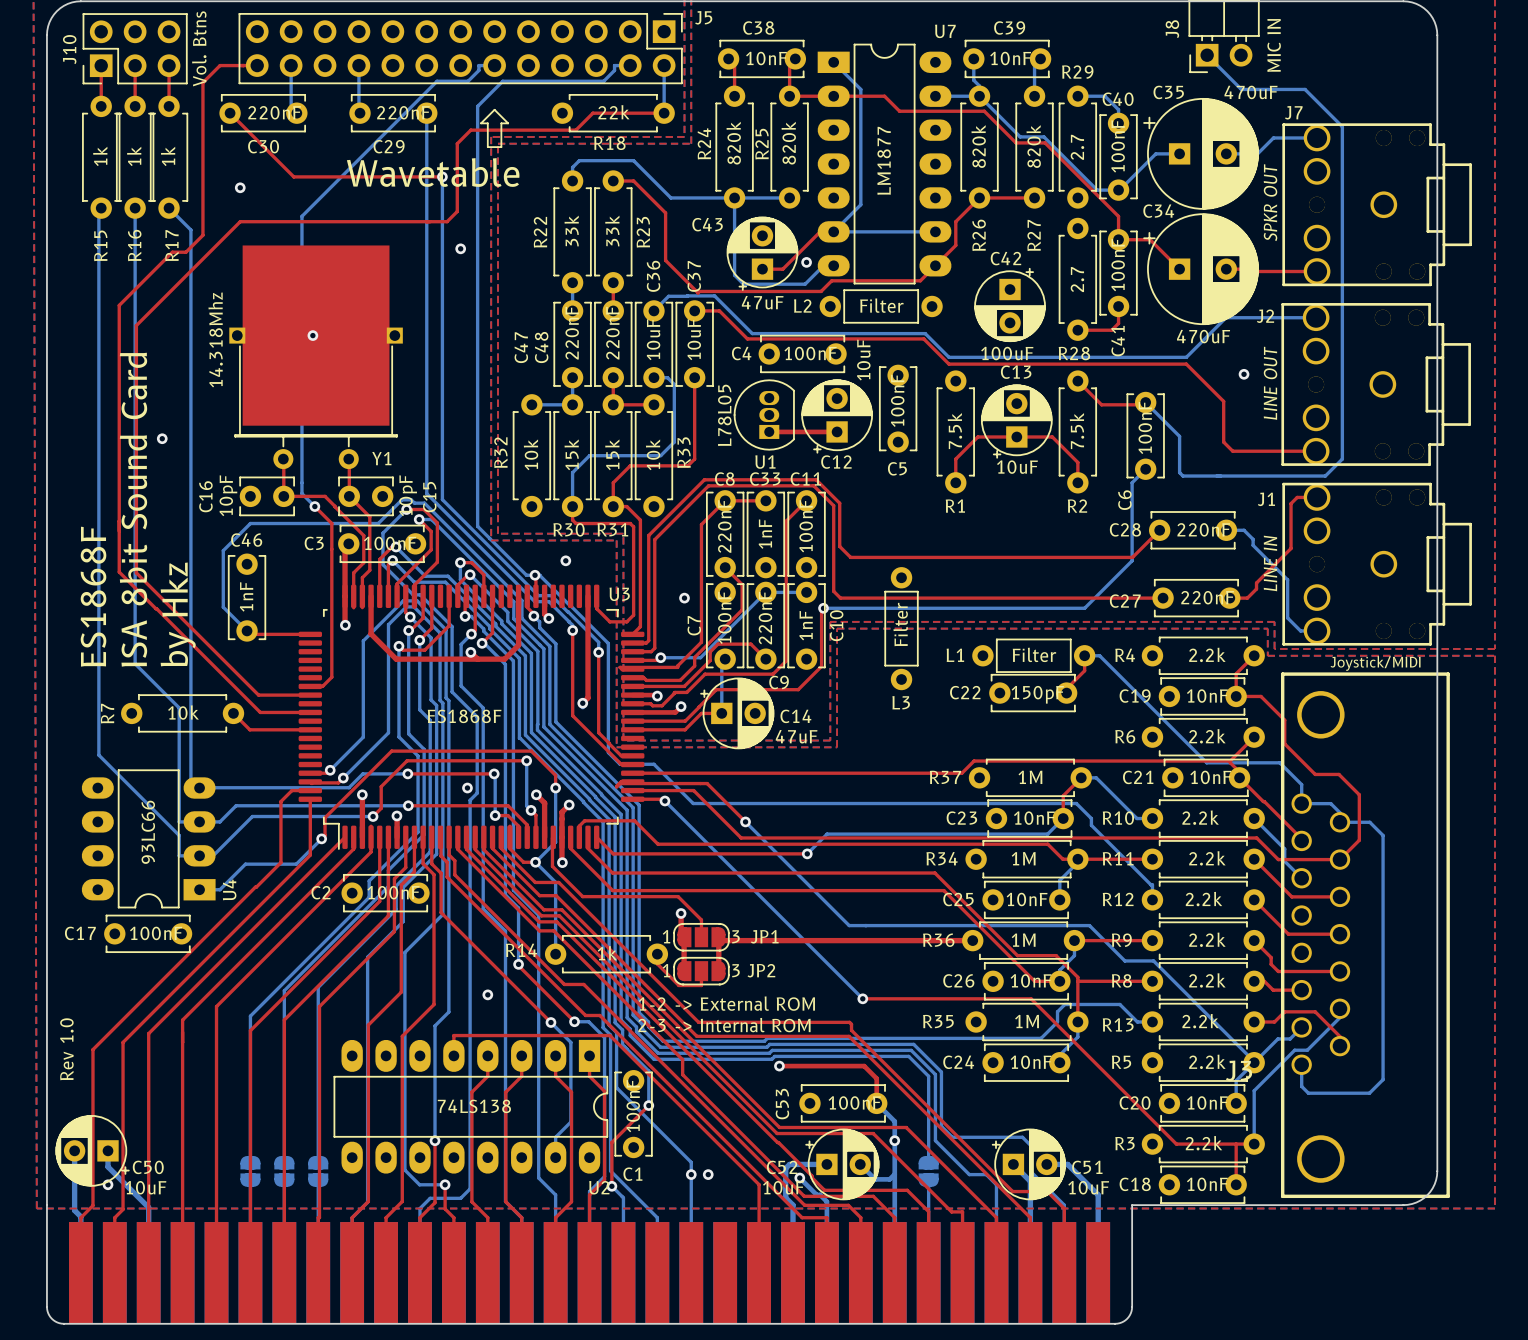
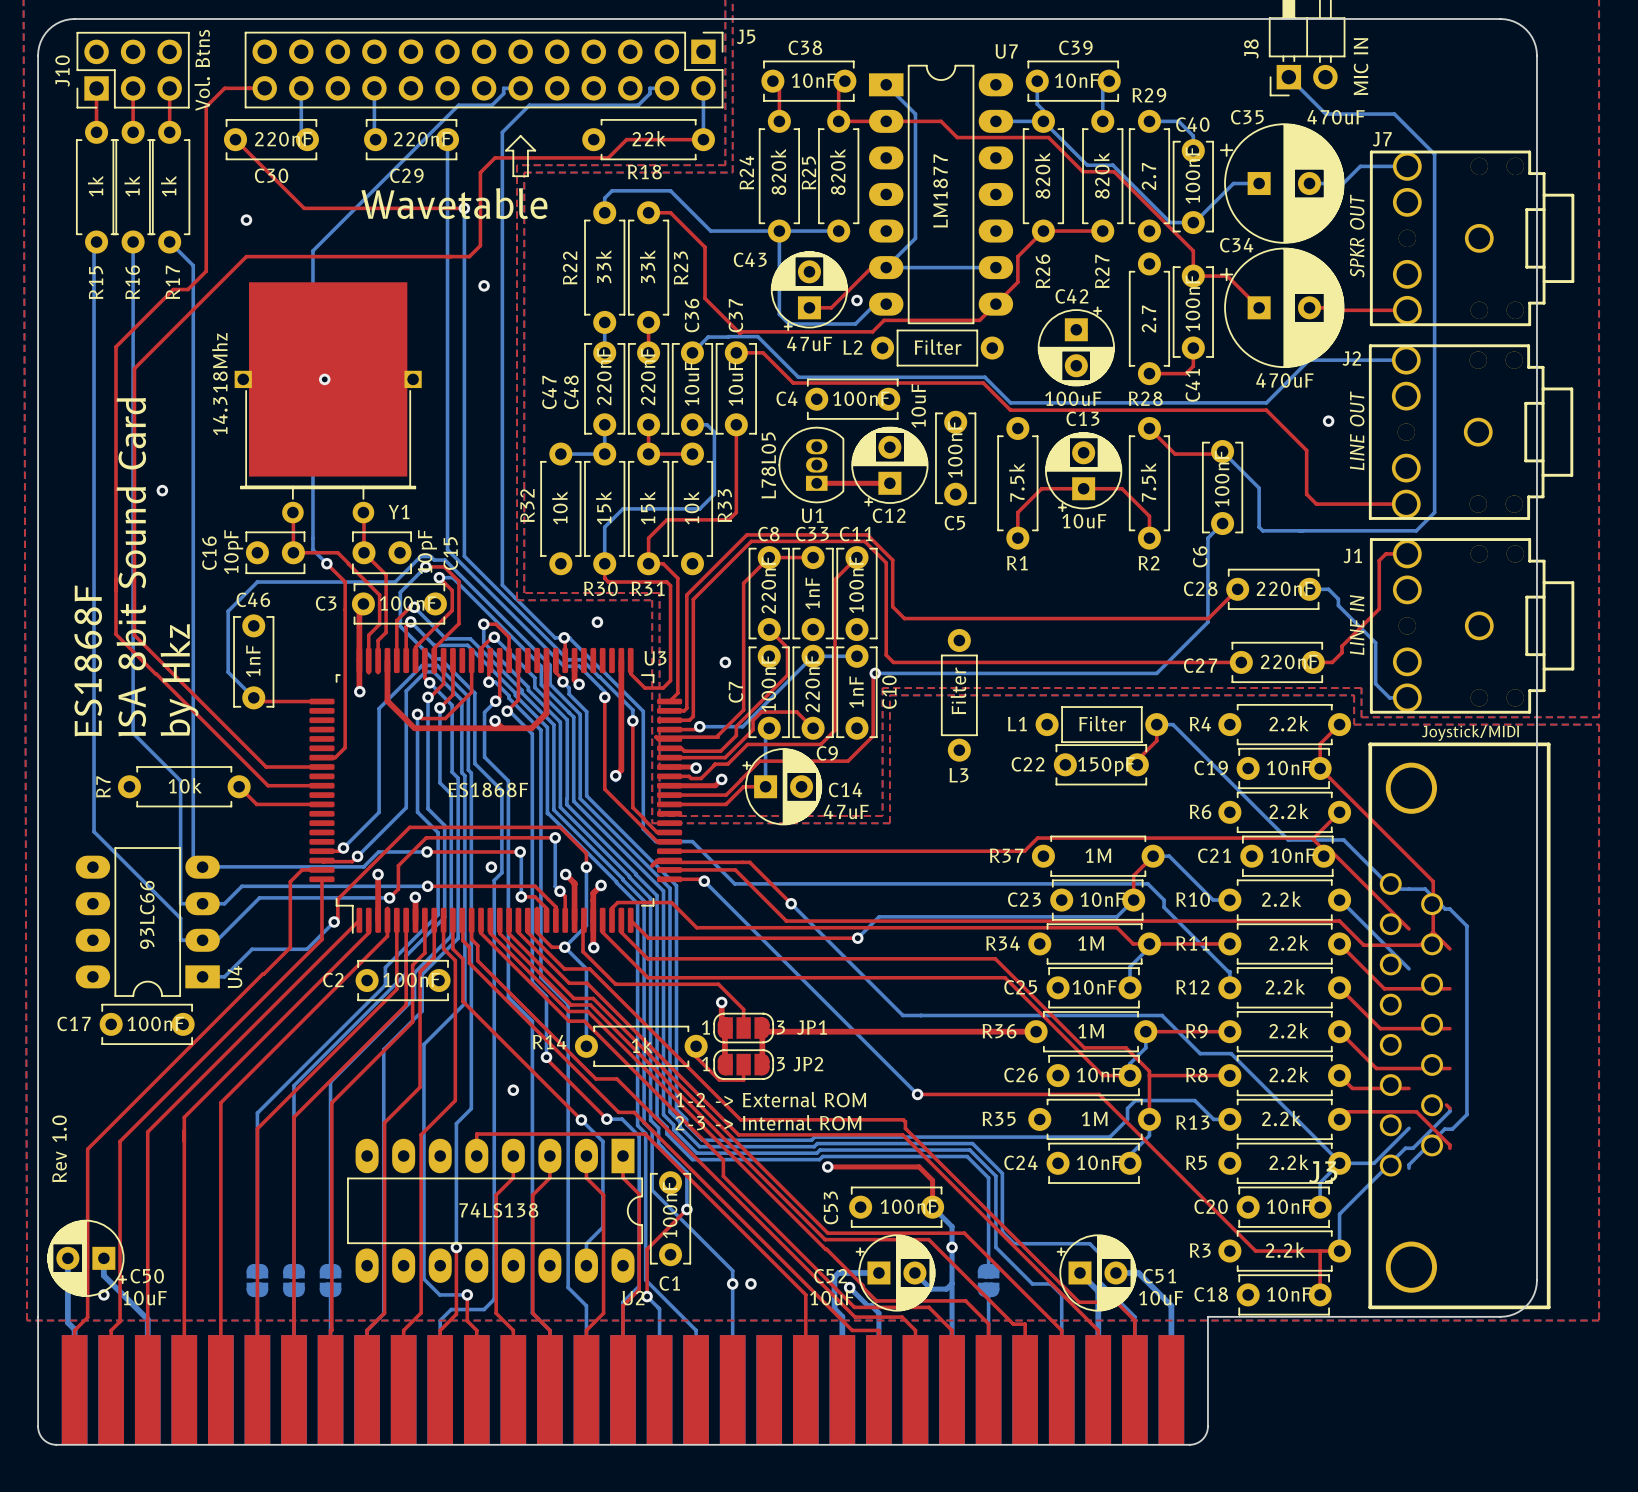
top track: (1236, 696) (1260, 696) (1284, 720) (1284, 743) (1315, 774) (1338, 774) (1359, 794) (1359, 840) (1339, 859) (1278, 859) (1256, 838) (1254, 838) -> (1320, 768) (1433, 881) (1433, 932)
bottom track: (1258, 762) (1279, 762) (1301, 784) (1301, 803) (1330, 803) (1339, 812) (1339, 822) (1369, 822) (1383, 835) (1383, 1079) (1369, 1093) (1308, 1093) (1301, 1086) (1301, 1064) -> (1343, 840) (1392, 889) (1425, 889) (1445, 909) (1449, 909) (1466, 926) (1466, 1114) (1452, 1129) (1444, 1129) (1409, 1164) (1409, 1168)
top track: none -> (1330, 849) (1409, 928)
top track: (1239, 777) (1301, 840) -> none
bottom track: (1254, 818) (1284, 849) (1284, 861) (1301, 878) -> none
bottom track: none -> (1340, 900) (1409, 968)
top track: none -> (1339, 921) (1363, 945) (1420, 945) (1433, 932)
top track: none -> (1433, 932) (1449, 948)
top track: (1291, 896) (1339, 896) -> (1380, 984) (1384, 988) (1449, 988)
top track: (1288, 934) (1339, 934) -> (1376, 1024) (1380, 1028) (1449, 1028)
top track: (1271, 957) (1271, 964) (1278, 971) (1339, 971) -> (1357, 1049) (1376, 1068) (1449, 1068)
top track: (1254, 981) (1264, 981) (1273, 990) (1301, 990) -> (1339, 1075) (1352, 1088) (1409, 1088)
bottom track: (1339, 1008) (1339, 1017) (1307, 1050) (1294, 1050) (1254, 1090) (1254, 1109) -> (1449, 1108) (1449, 1111) (1413, 1148) (1405, 1148) (1339, 1214)
top track: none -> (1446, 1104) (1449, 1108)
top track: (1254, 1022) (1274, 1022) (1284, 1011) (1315, 1011) (1339, 1036) (1339, 1046) -> (1339, 1119) (1347, 1111) (1416, 1111) (1449, 1145) (1449, 1148)
bottom track: (1301, 1027) (1290, 1038) (1277, 1038) (1254, 1062) -> (1409, 1128) (1374, 1163) (1339, 1163)

